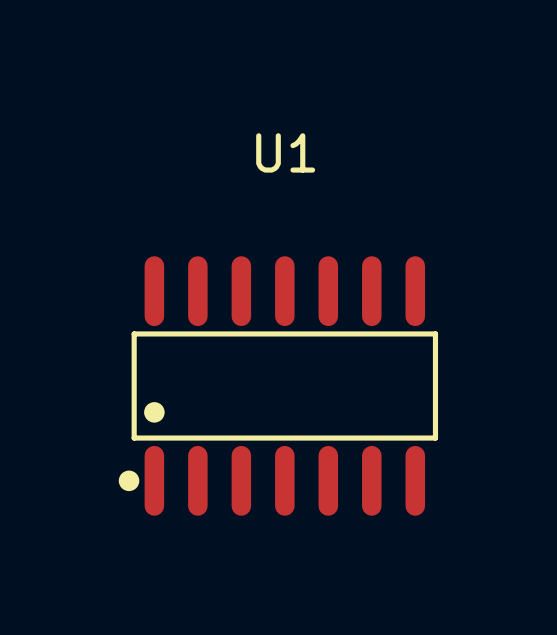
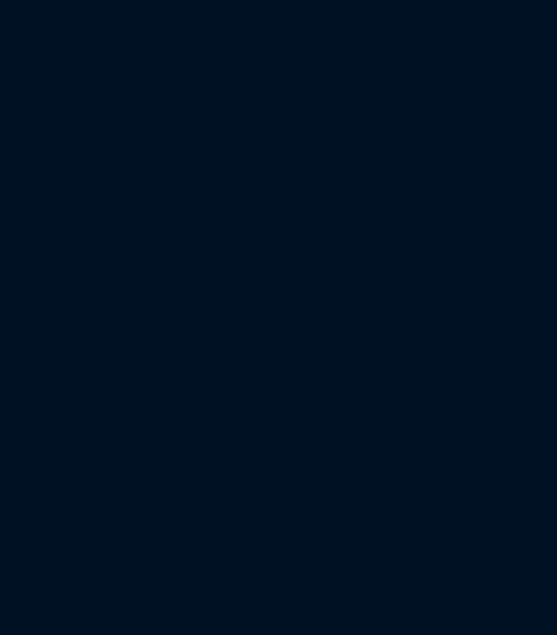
U1: (278, 386) -> none

